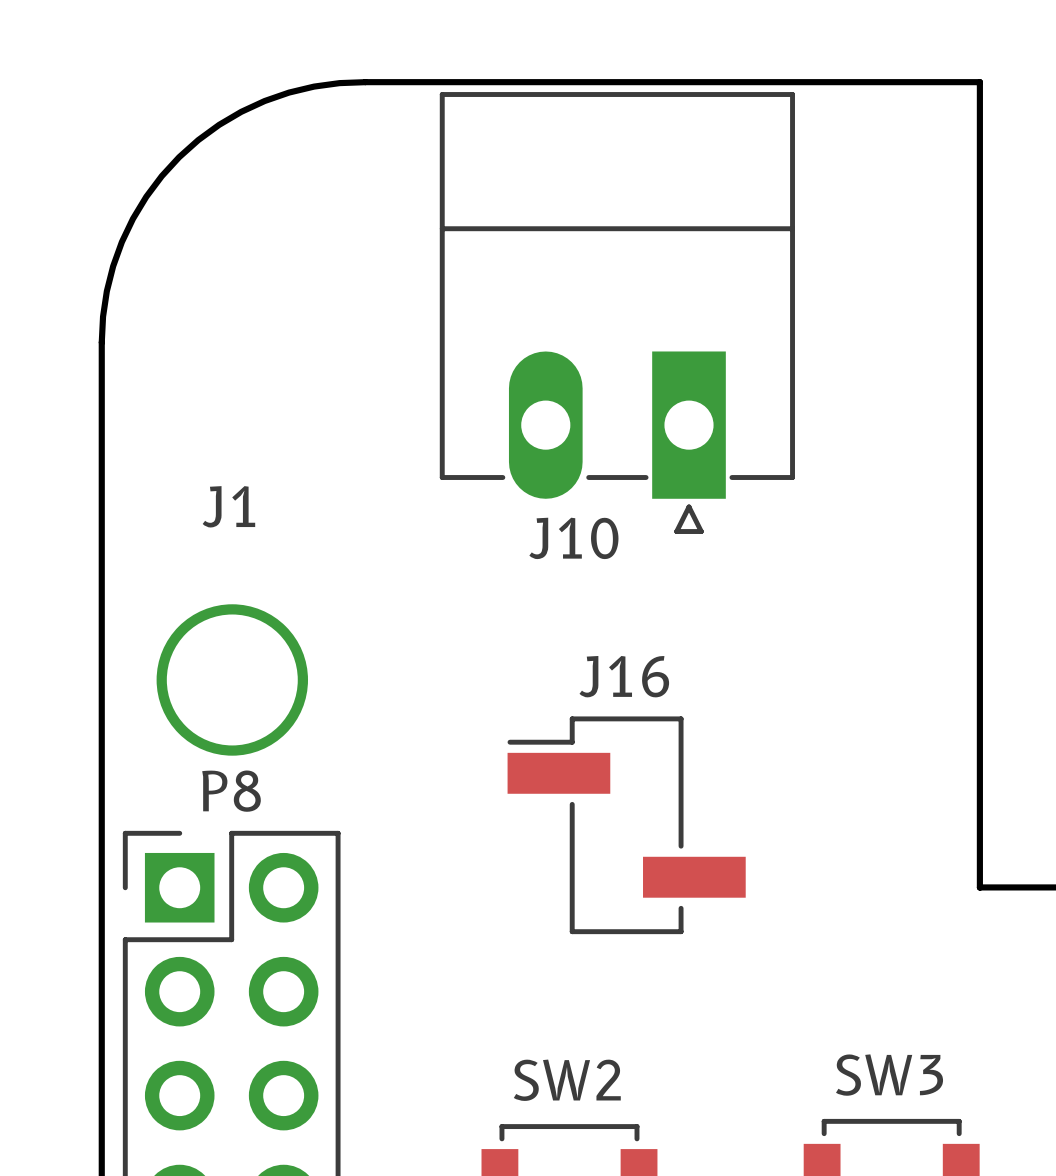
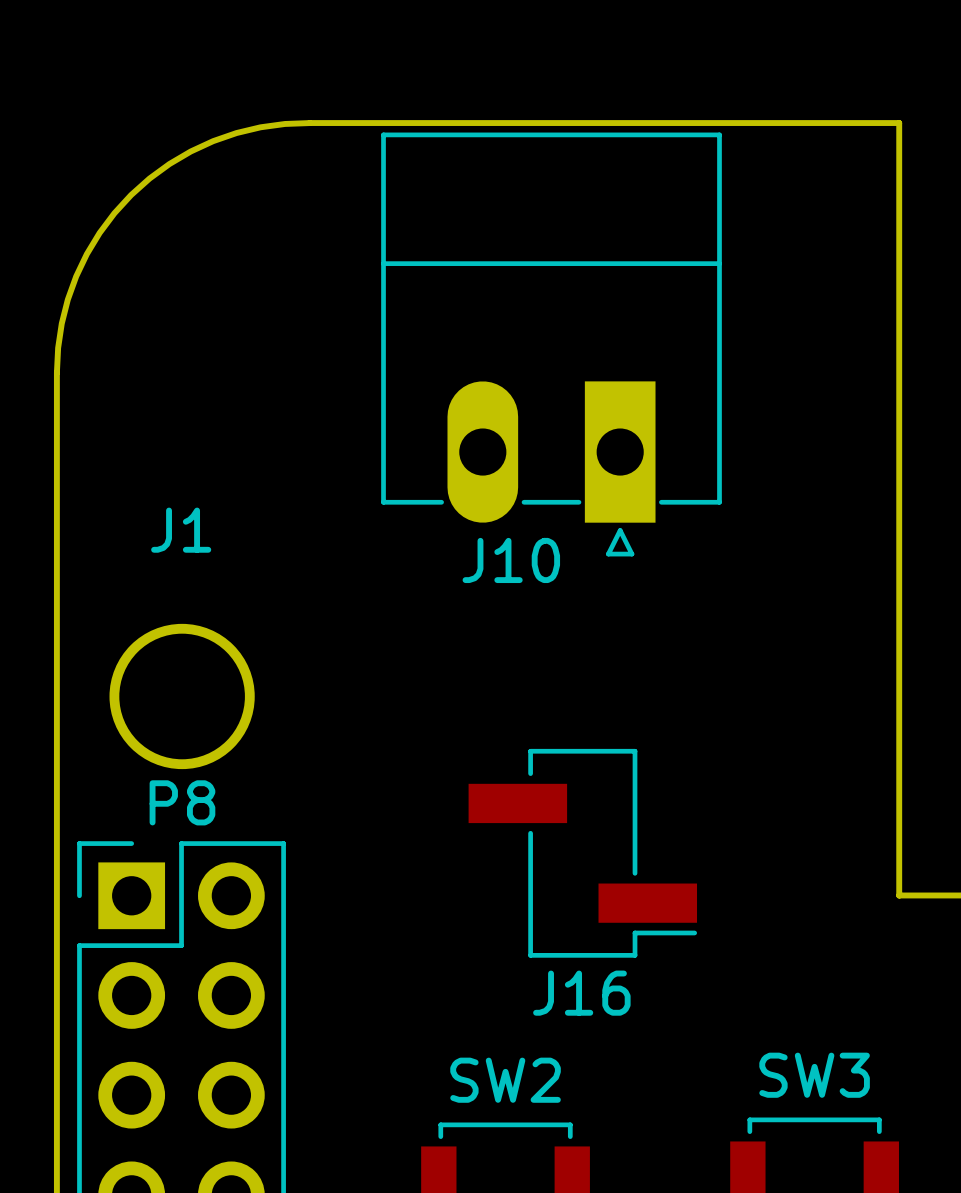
J16 rotation: 0° (626, 825) -> 180° (582, 853)

